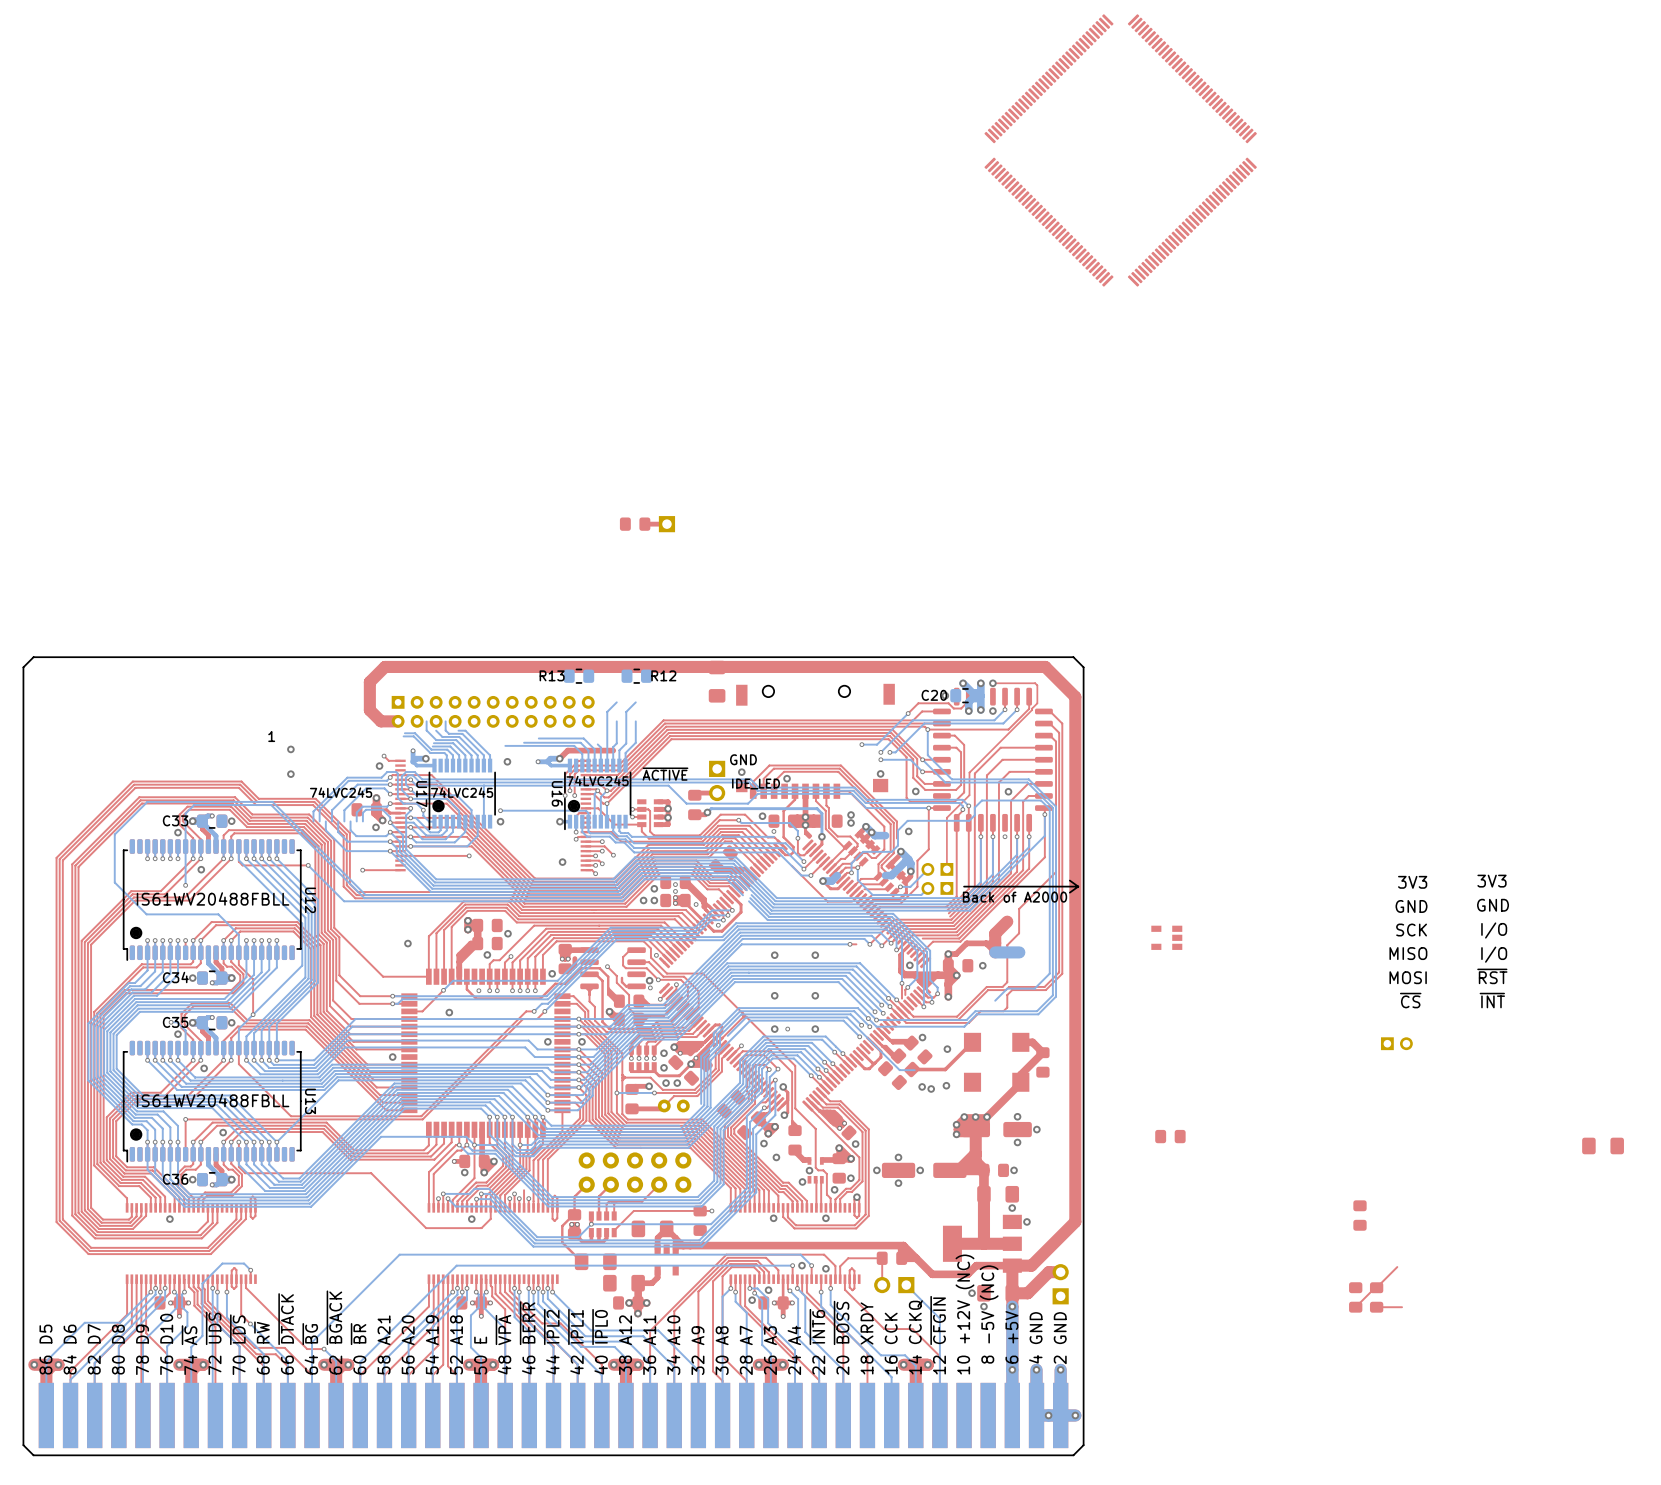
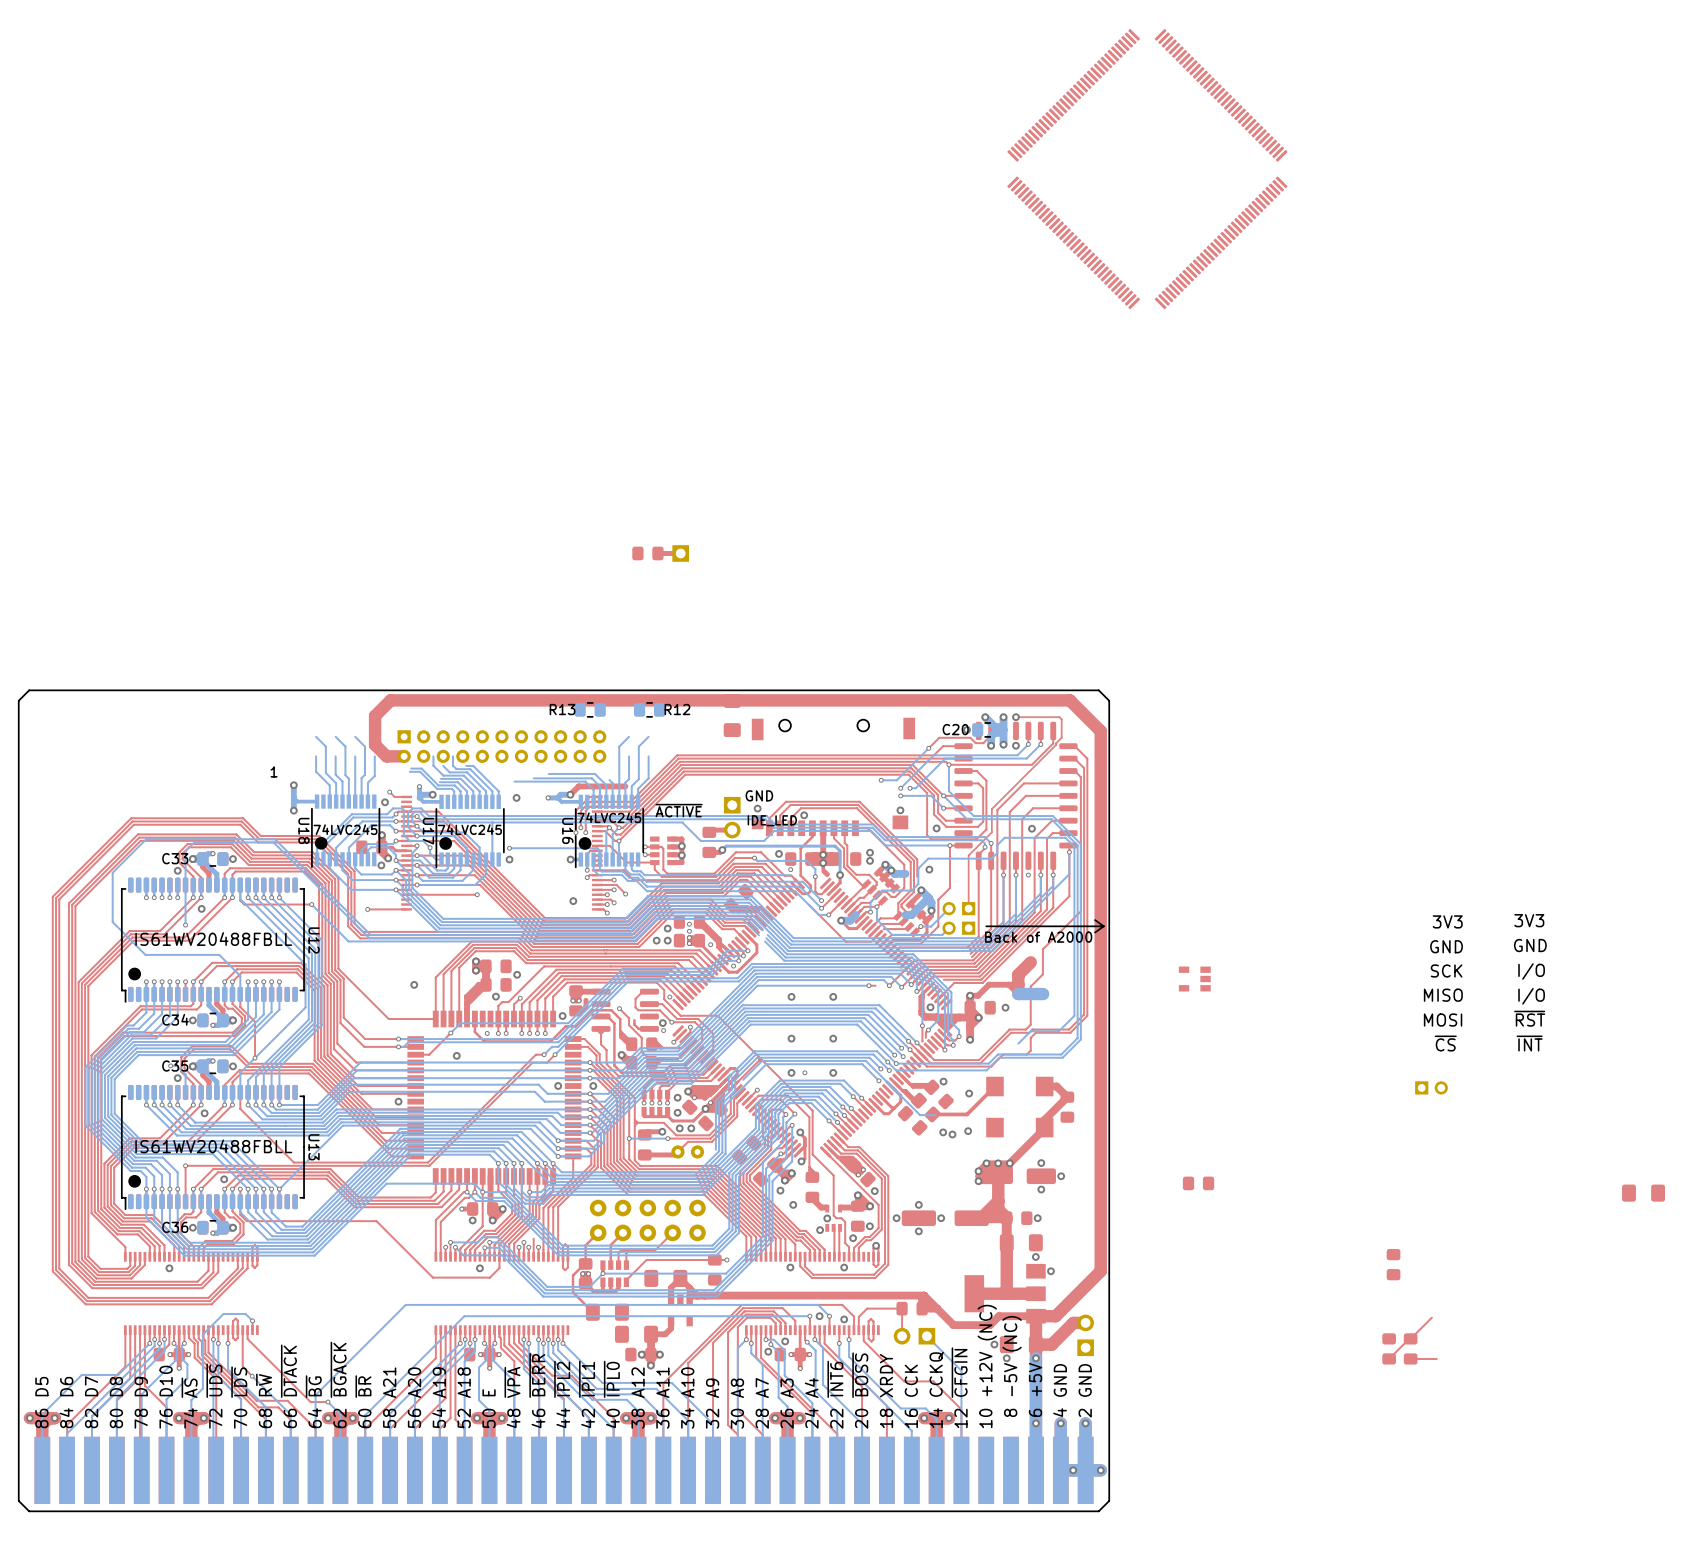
bottom track: none -> (316, 736) (325, 746) (325, 772) (336, 783) (336, 801)
bottom track: none -> (335, 736) (345, 746) (345, 775) (348, 778) (348, 801)
bottom track: none -> (355, 736) (365, 746) (365, 774) (361, 778) (361, 801)
bottom track: none -> (316, 756) (316, 771) (329, 785) (329, 801)
bottom track: none -> (335, 756) (335, 774) (342, 781) (342, 801)
bottom track: none -> (355, 756) (355, 801)
bottom track: none -> (374, 756) (374, 775) (367, 782) (367, 801)
bottom track: none -> (293, 785) (293, 810)
bottom track: none -> (293, 797) (297, 801) (317, 801)
U18: none -> (345, 831)

